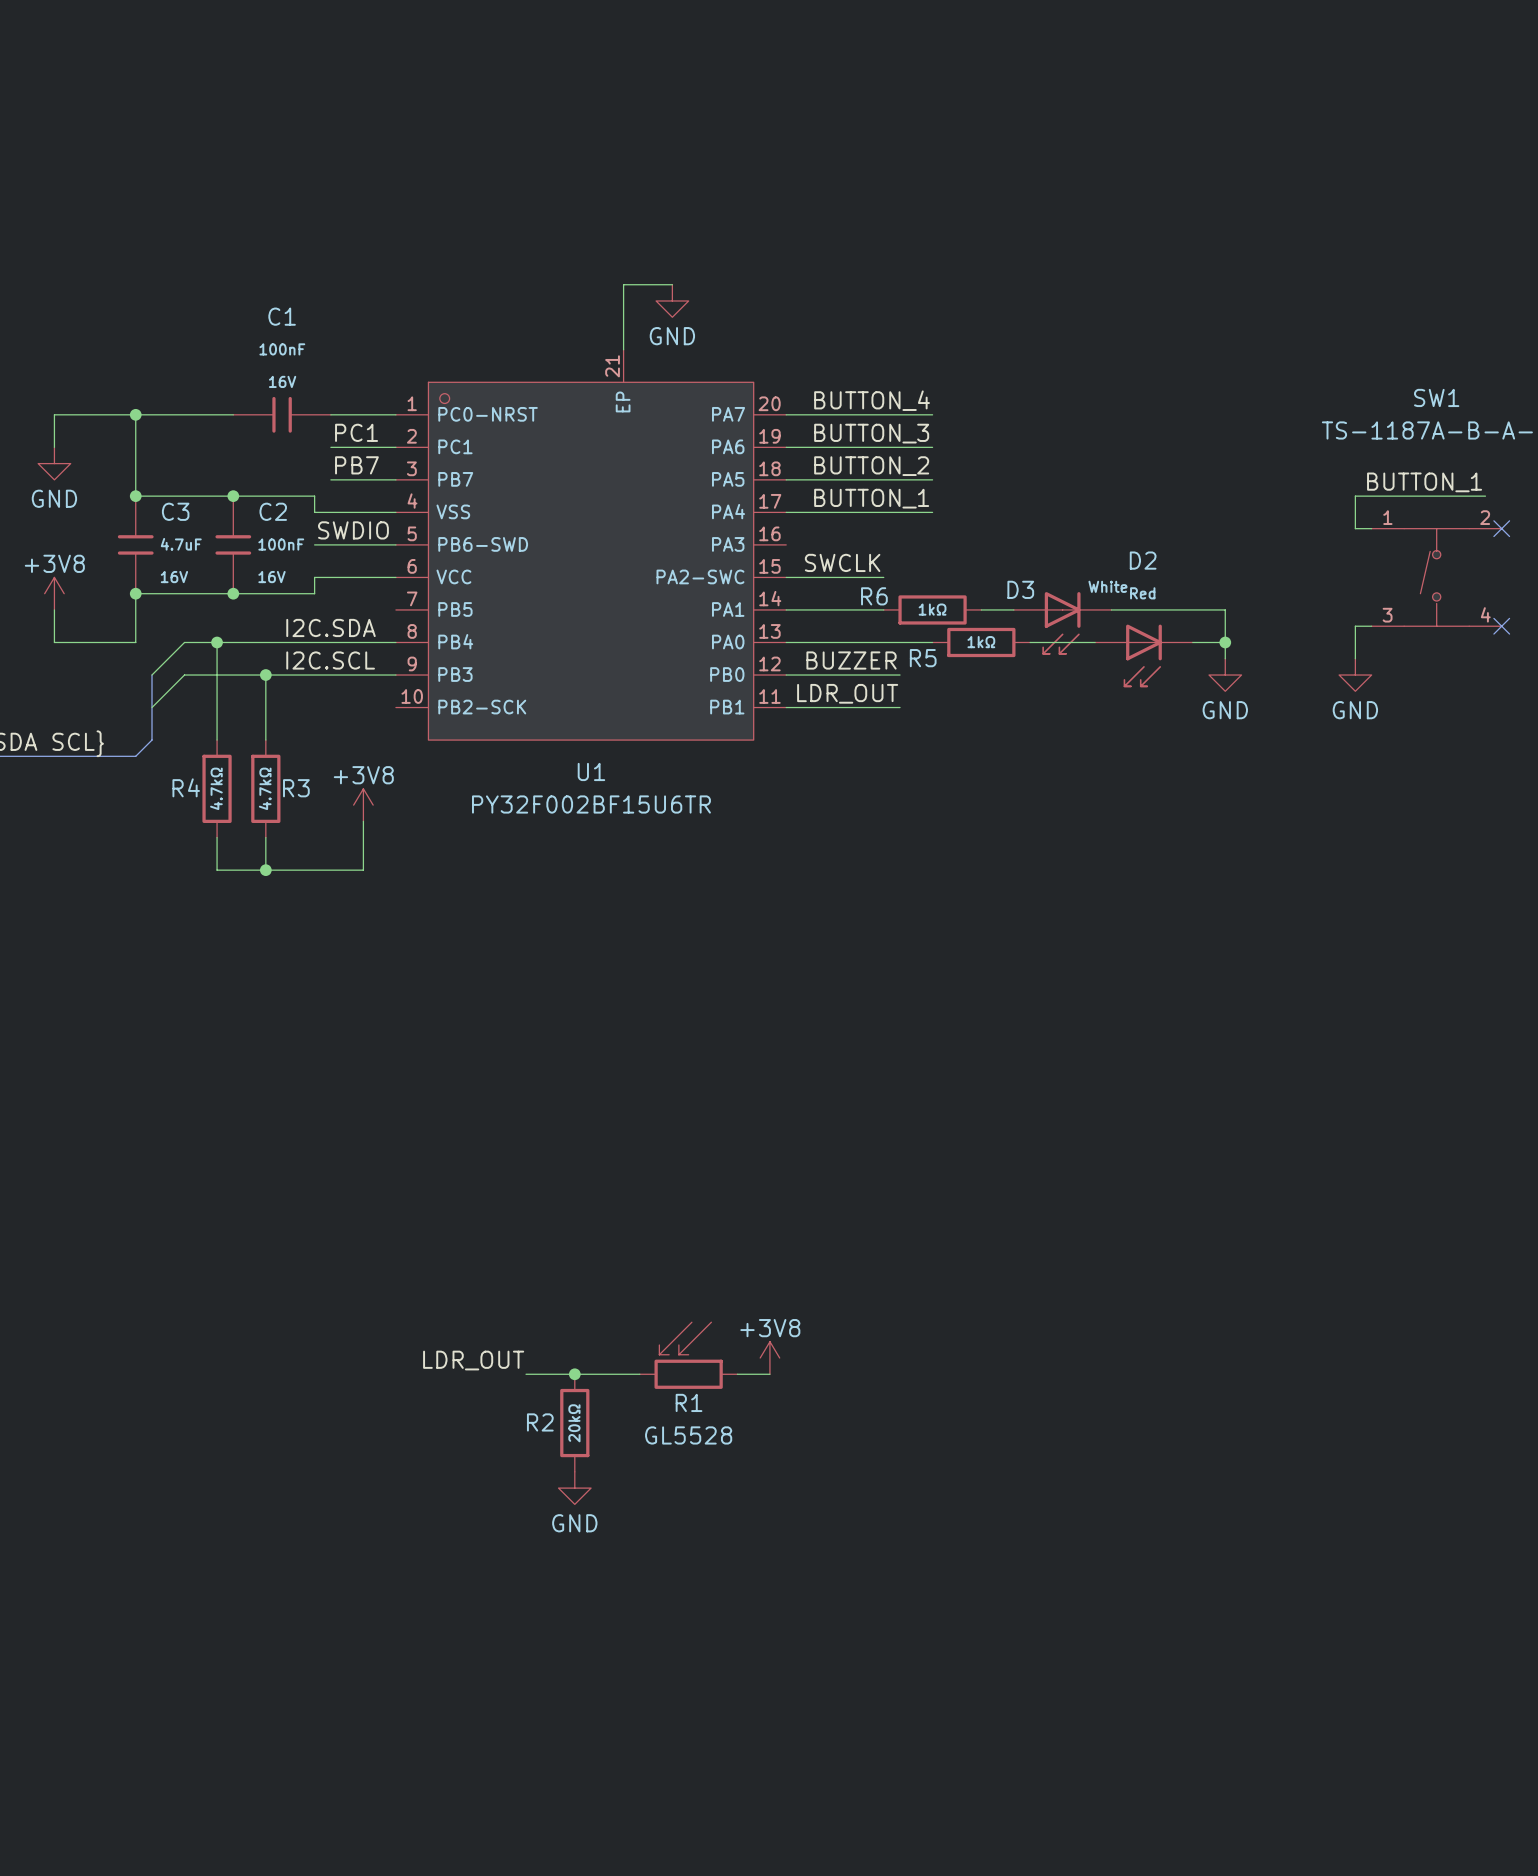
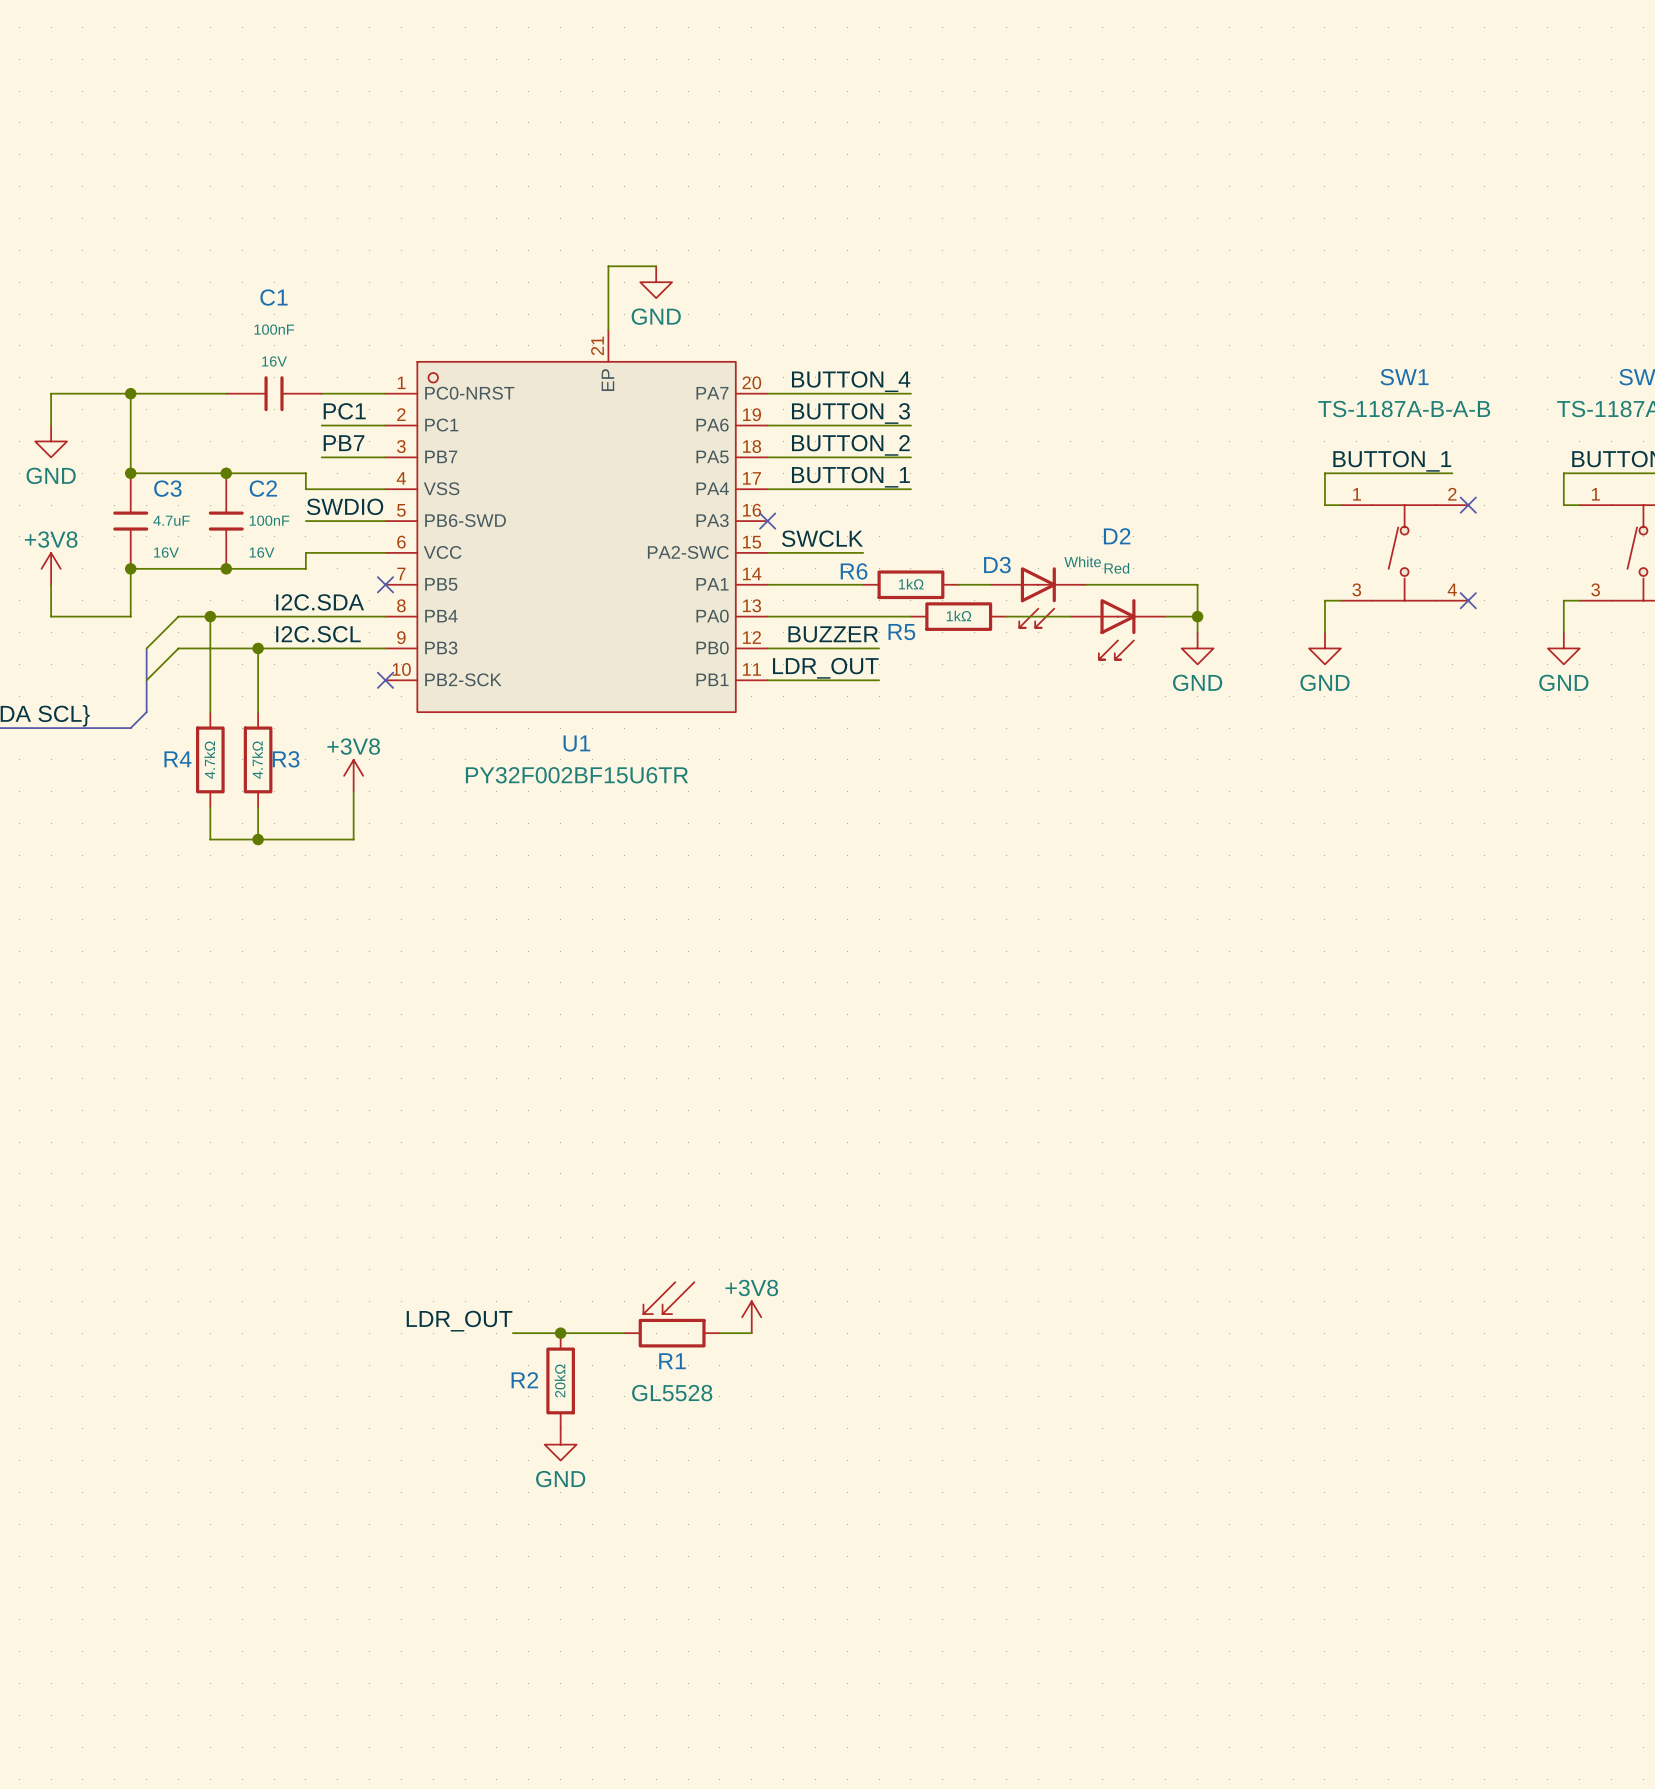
no-connect mark: none -> (767, 521)
no-connect mark: none -> (385, 584)
no-connect mark: none -> (385, 680)

